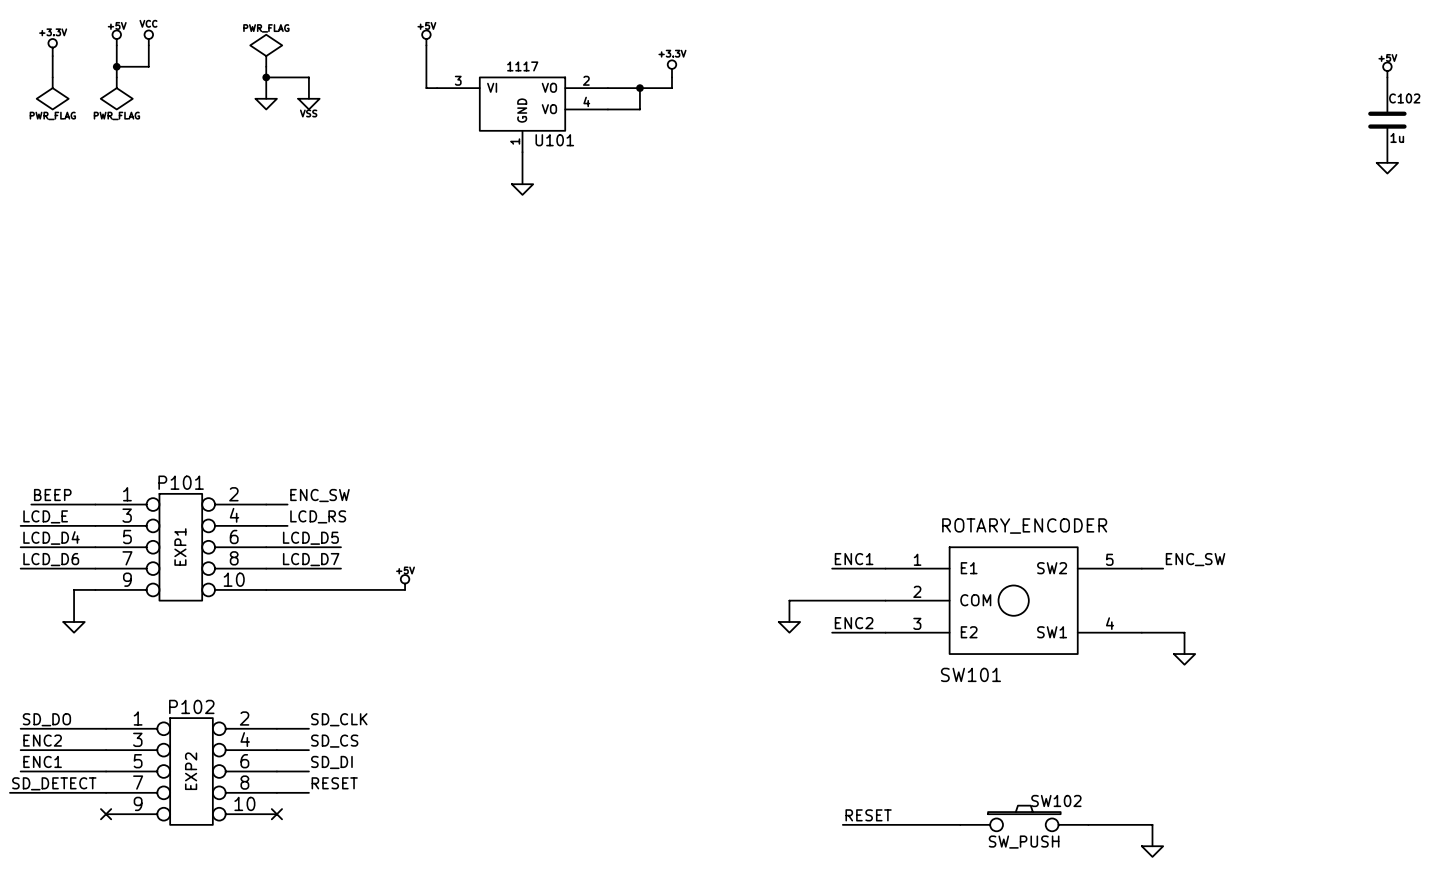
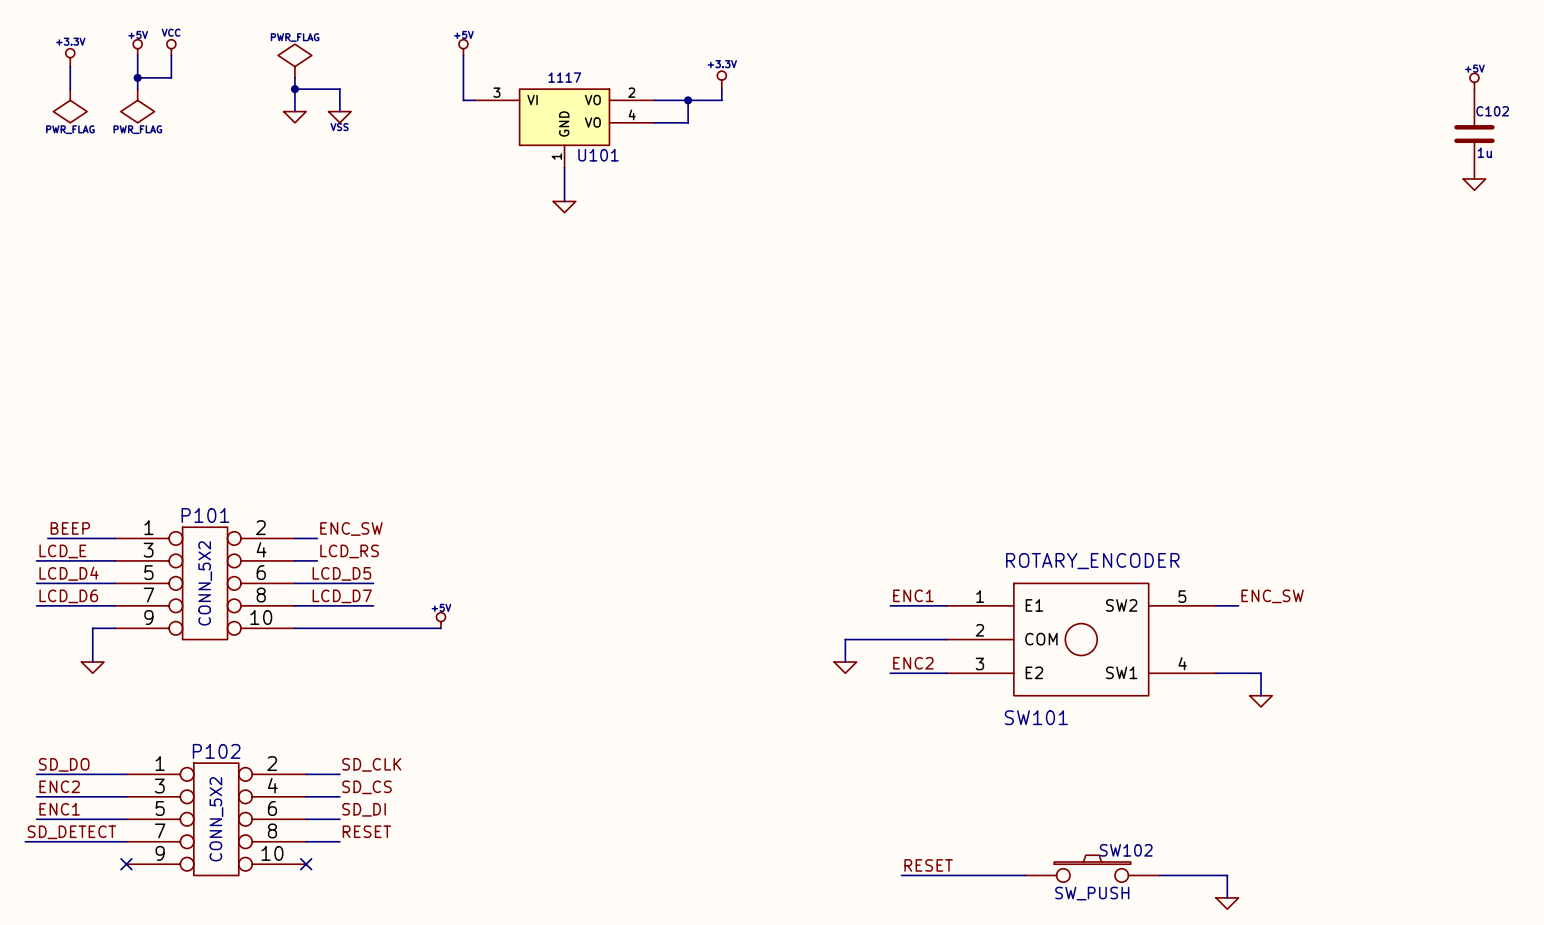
P101 value: EXP1 (180, 547) -> CONN_5X2 (205, 583)
P102 value: EXP2 (191, 771) -> CONN_5X2 (216, 819)

